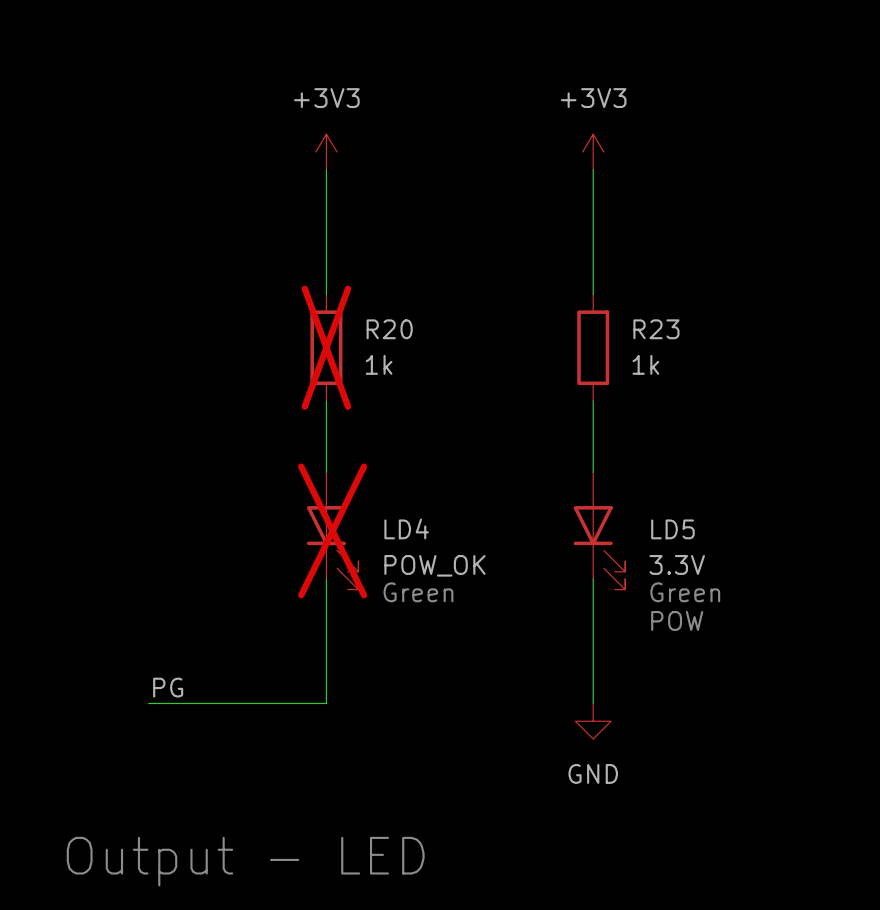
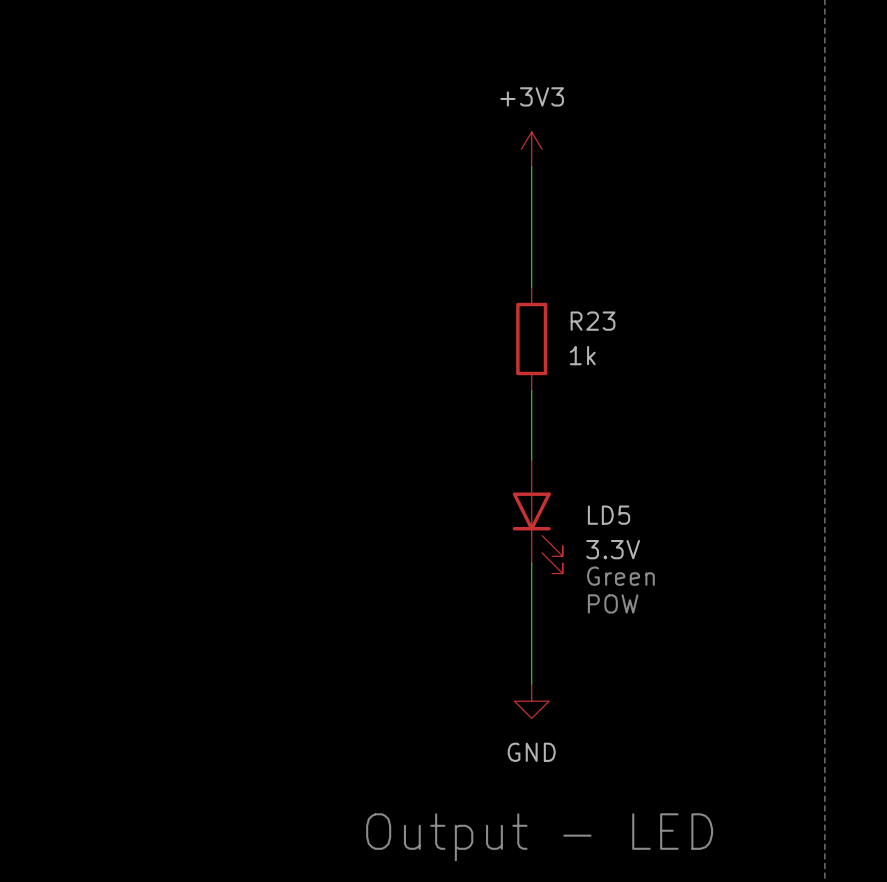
power symbol: +3V3 (326, 152) -> none
wire: (326, 169) (326, 294) -> none
R20: 1k (326, 347) -> none
wire: (326, 401) (326, 472) -> none
LD4: POW_OK (332, 530) -> none
wire: (326, 578) (326, 703) (148, 703) -> none
text: Green (418, 592) -> none
label: PG (168, 687) -> none
text: Output - LED (245, 861) -> none
text: none -> Output - LED (539, 837)

